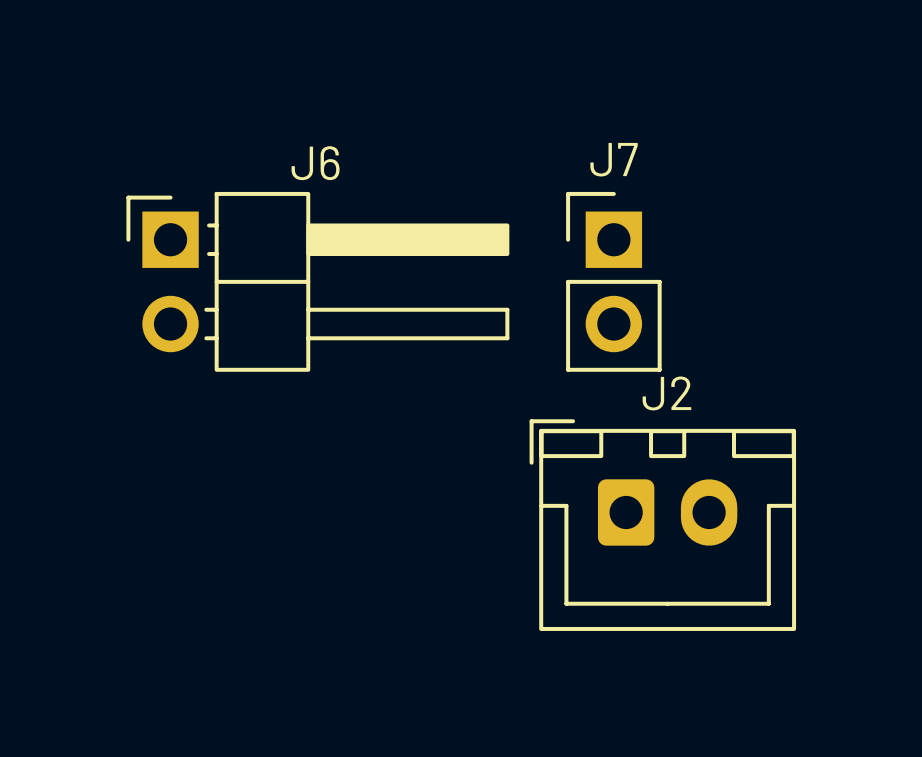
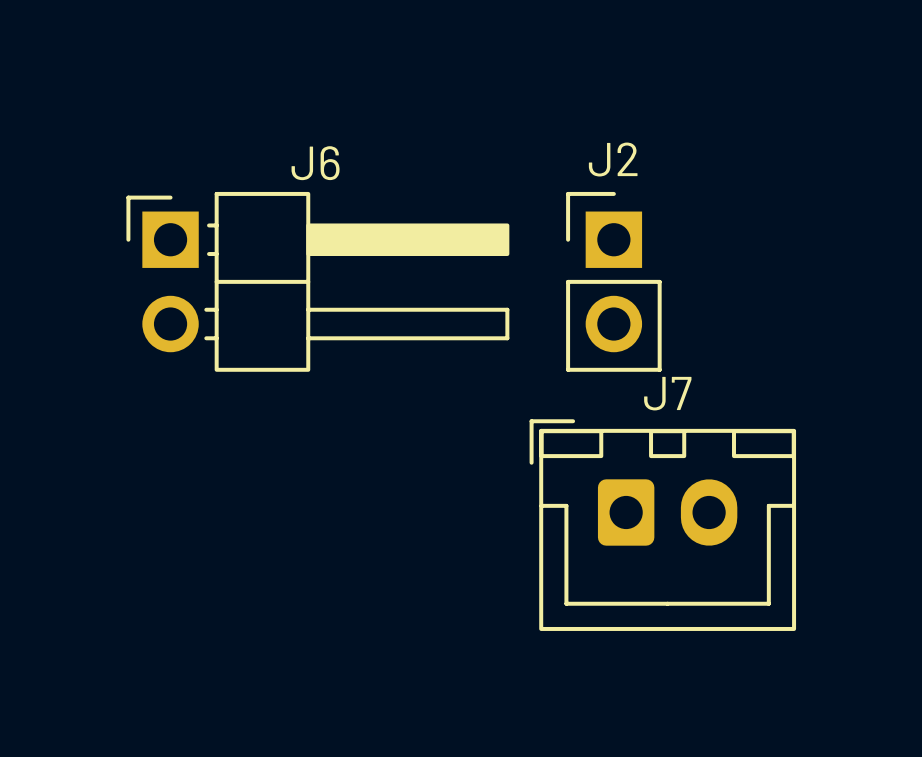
J7 name: J7 (614, 159) -> J2 (613, 159)
J2 name: J2 (666, 393) -> J7 (667, 393)

